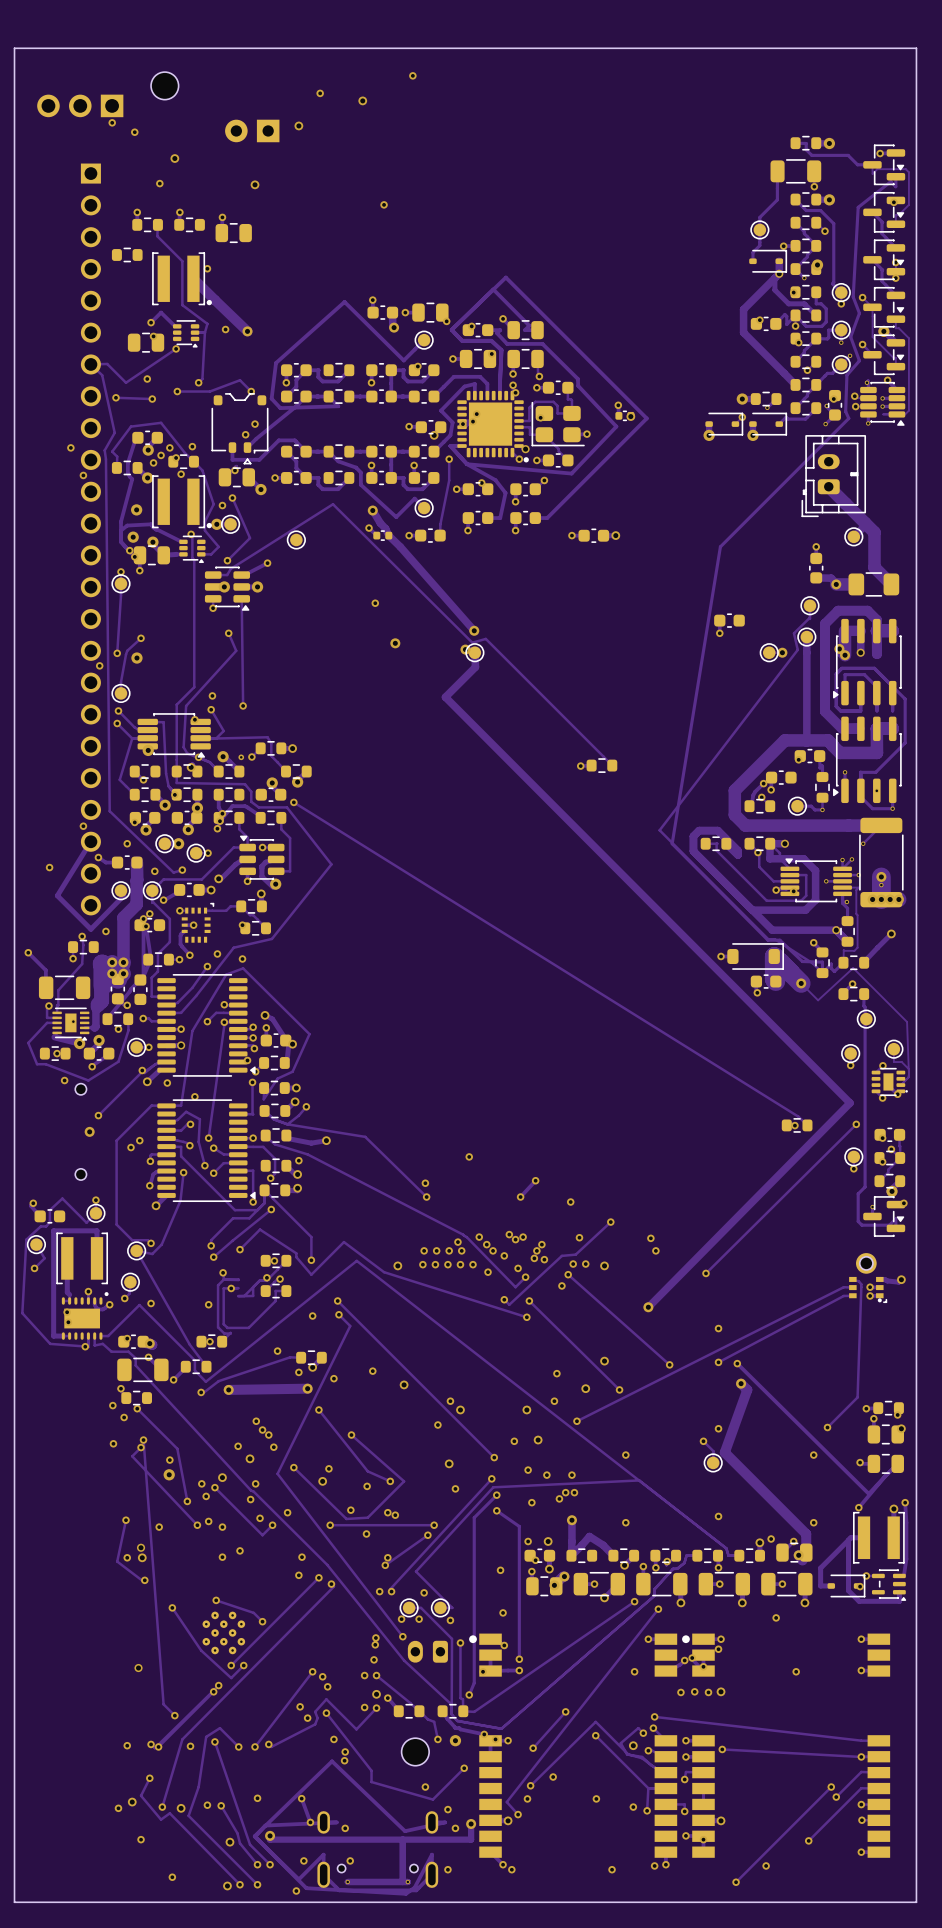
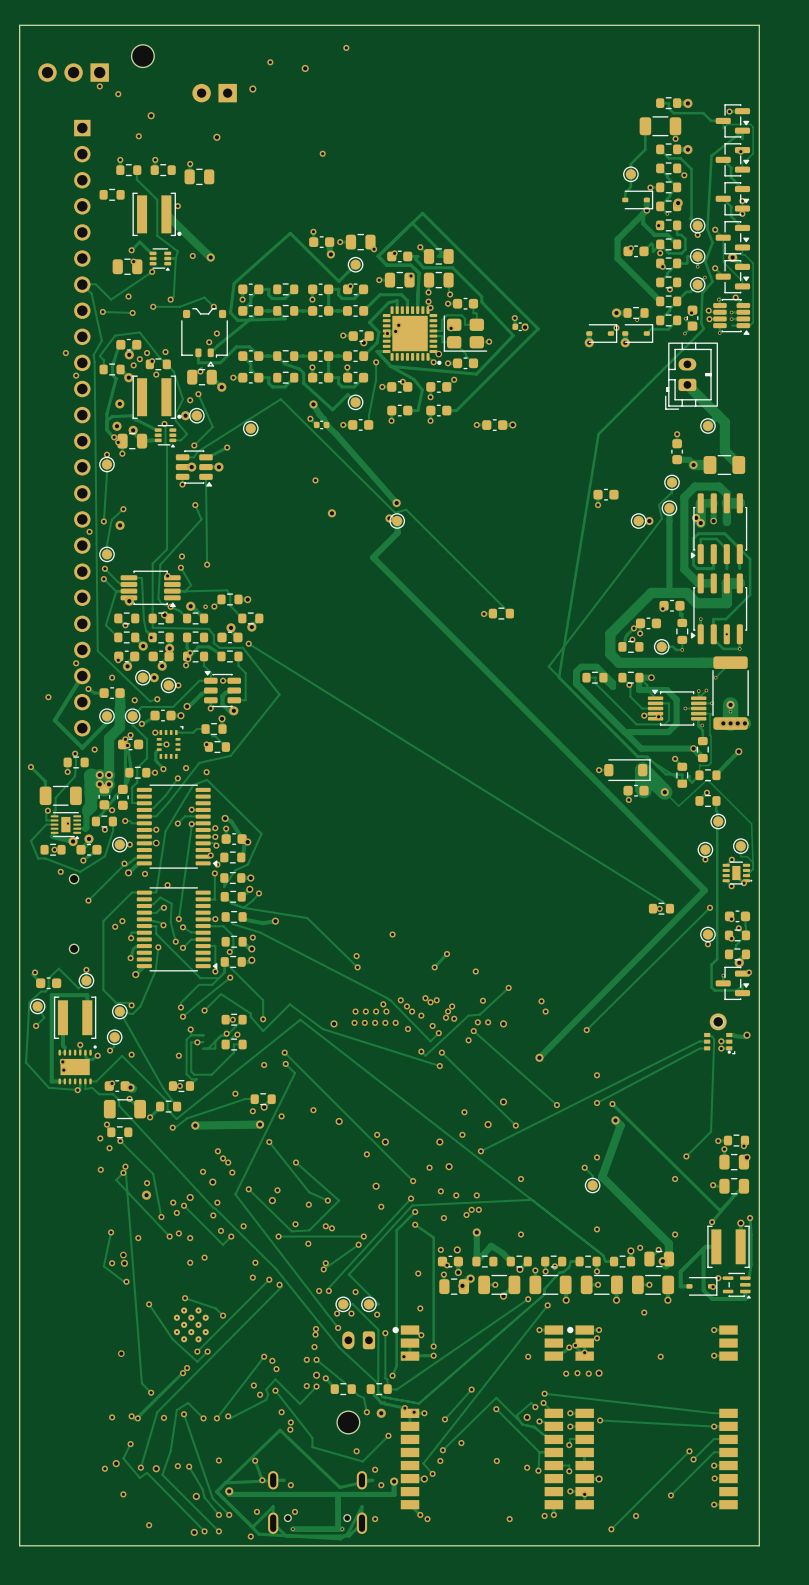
via: (89, 1131) -> none

